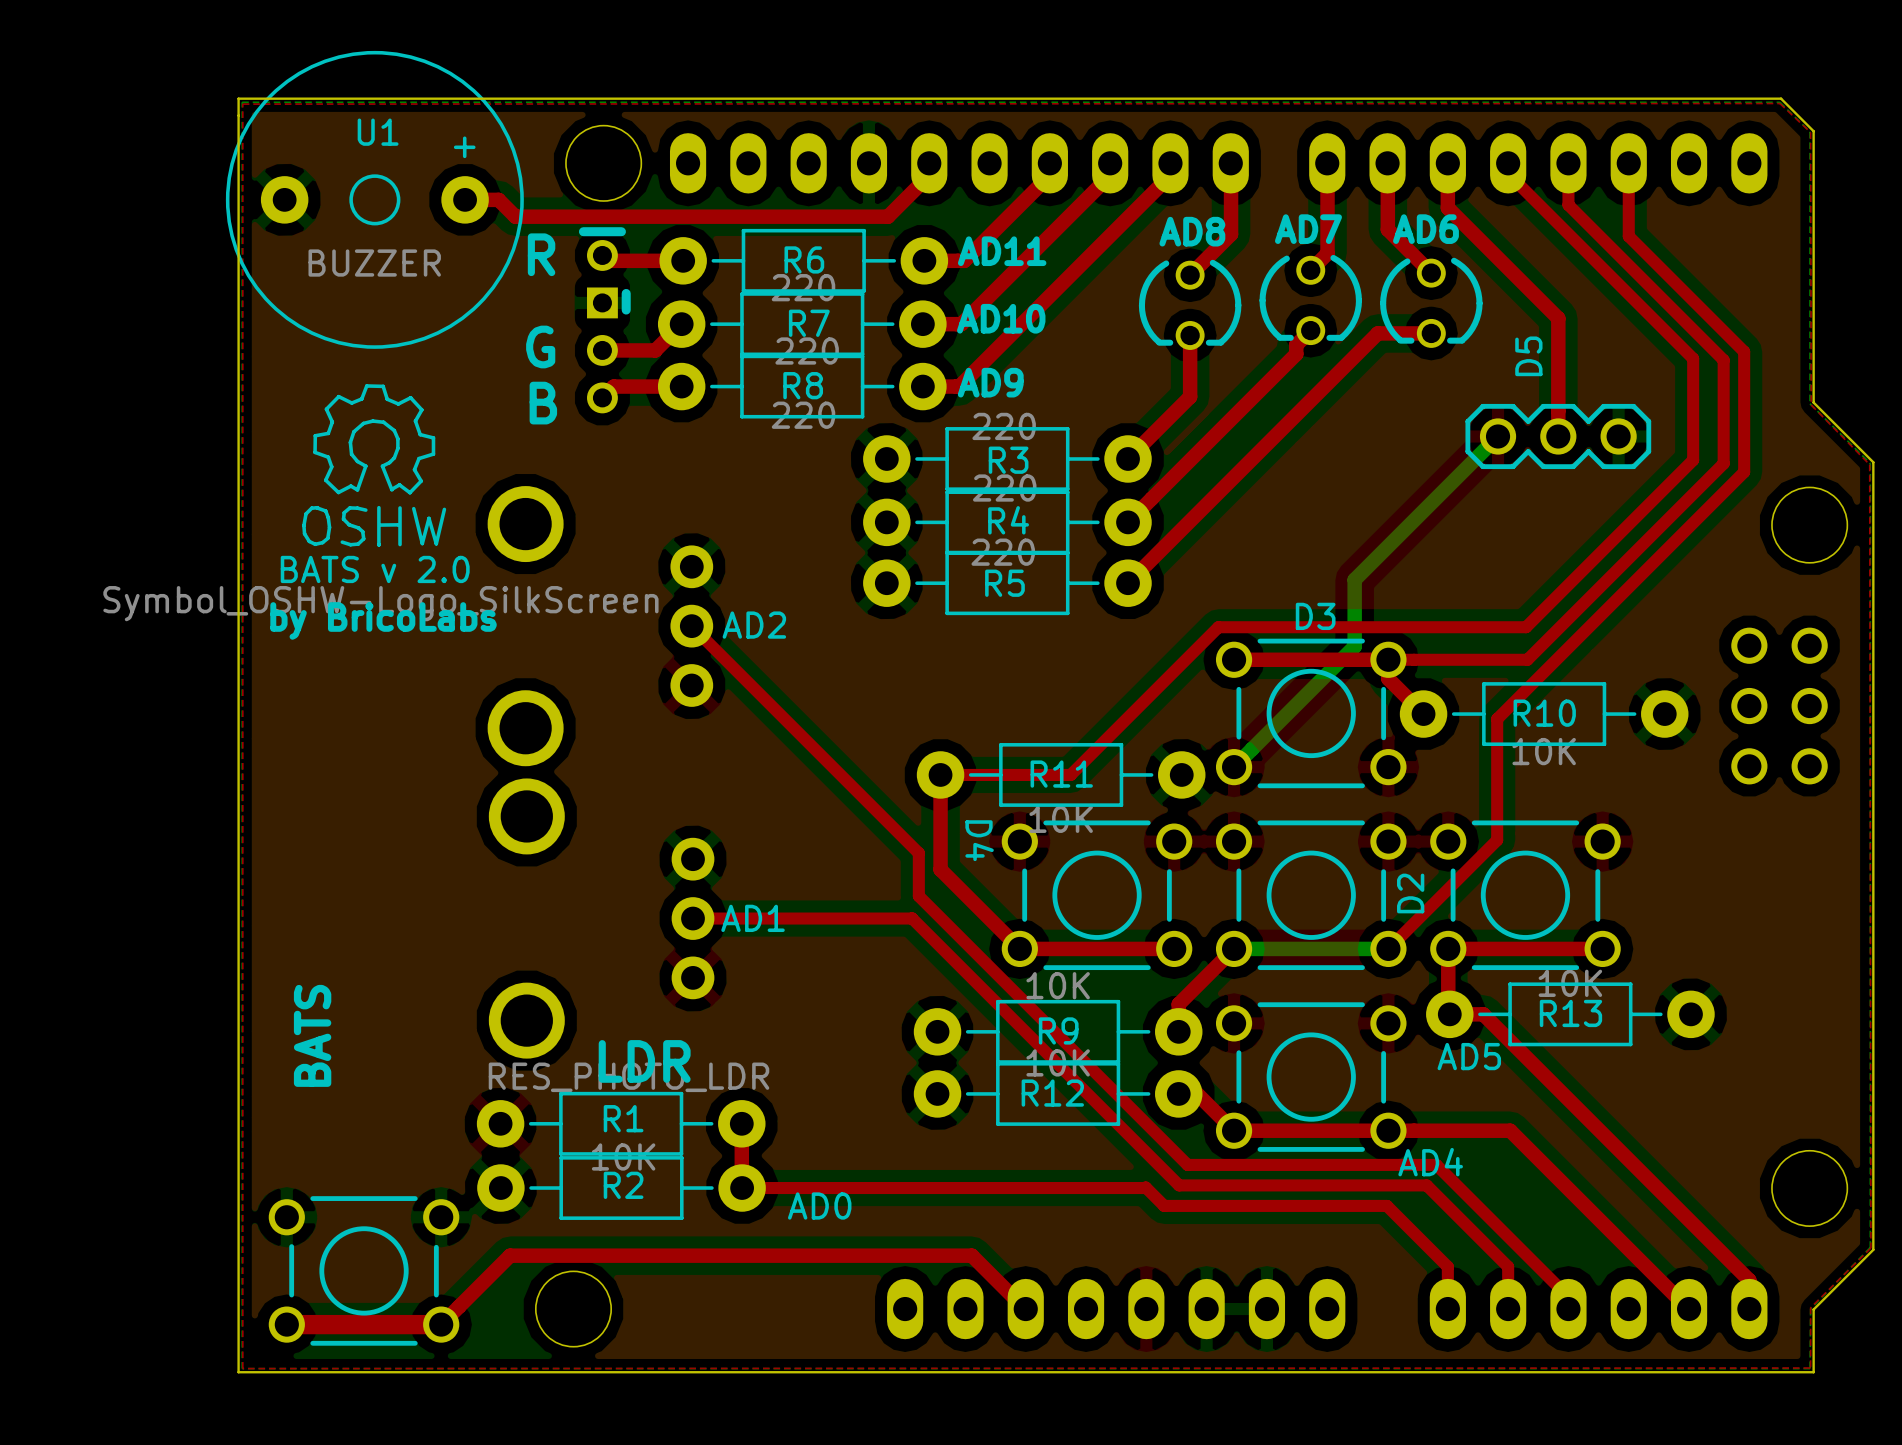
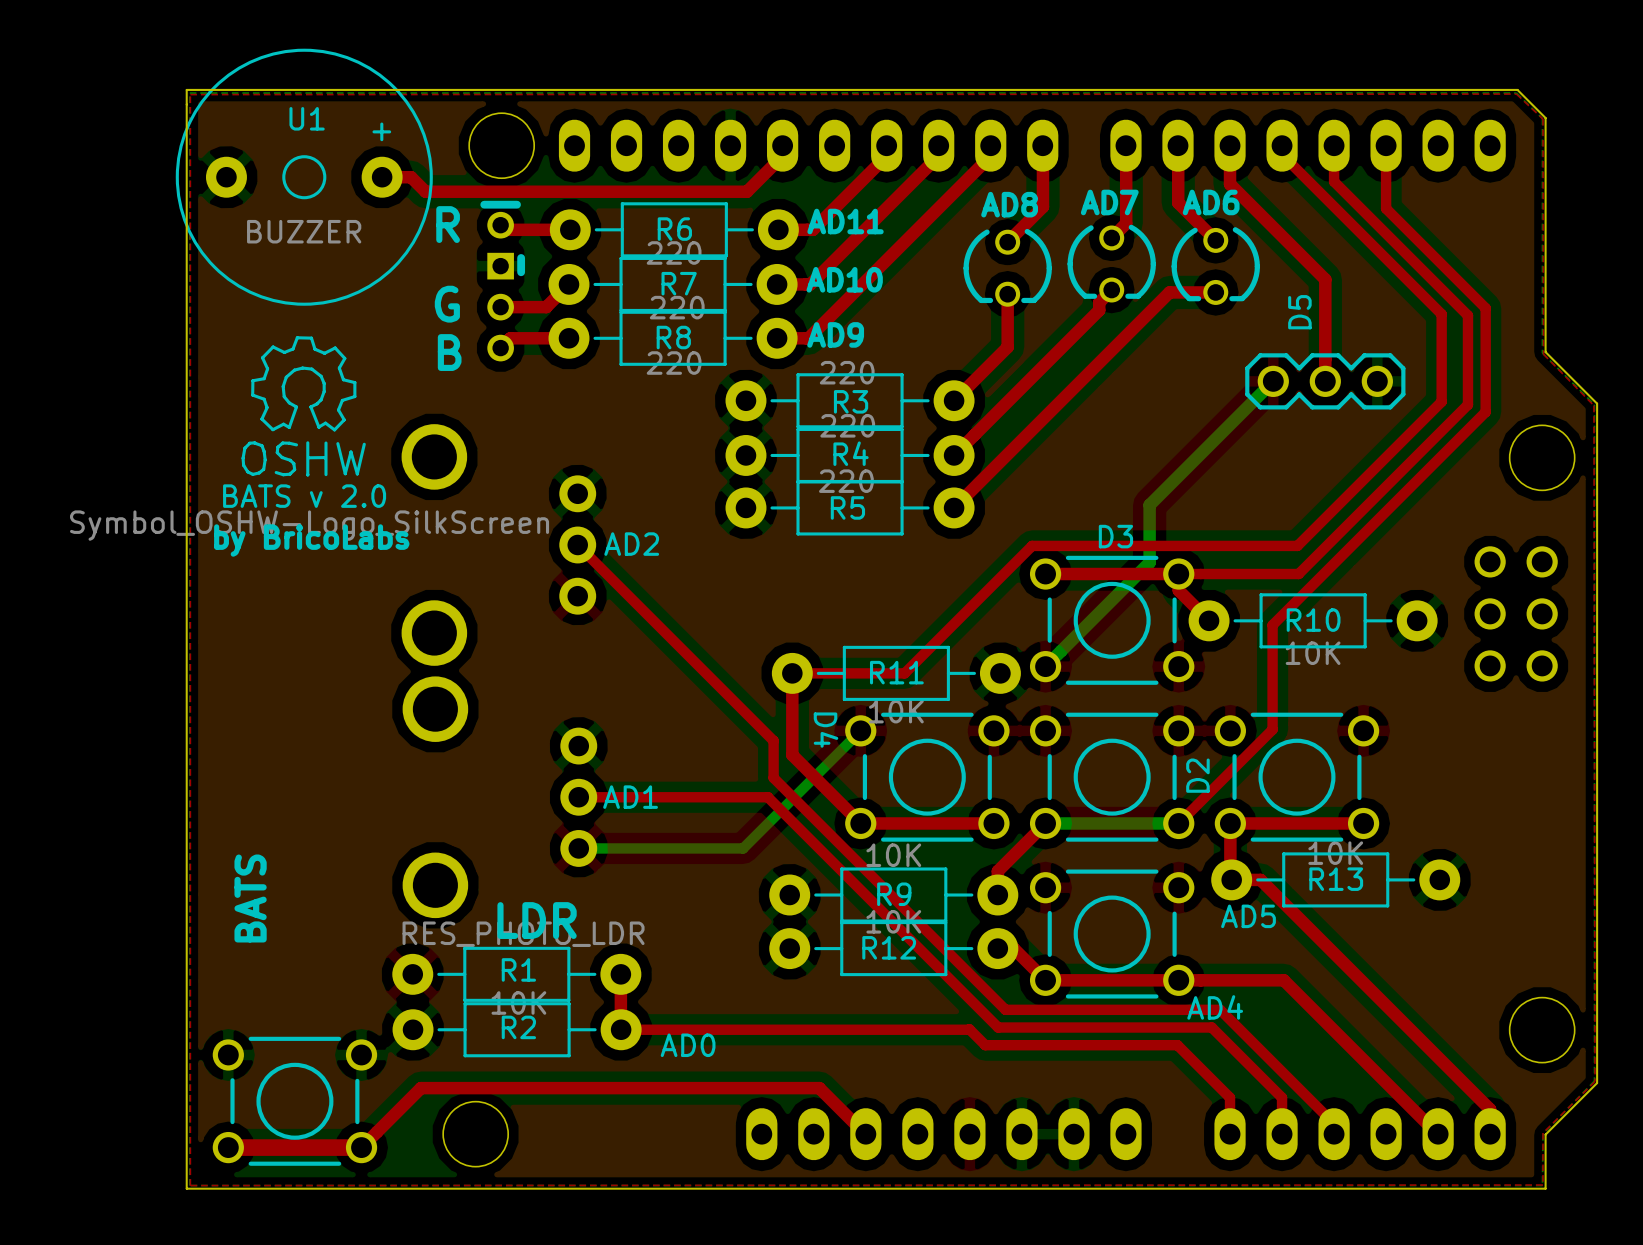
bottom track: none -> (860, 730) (743, 848) (578, 848)

